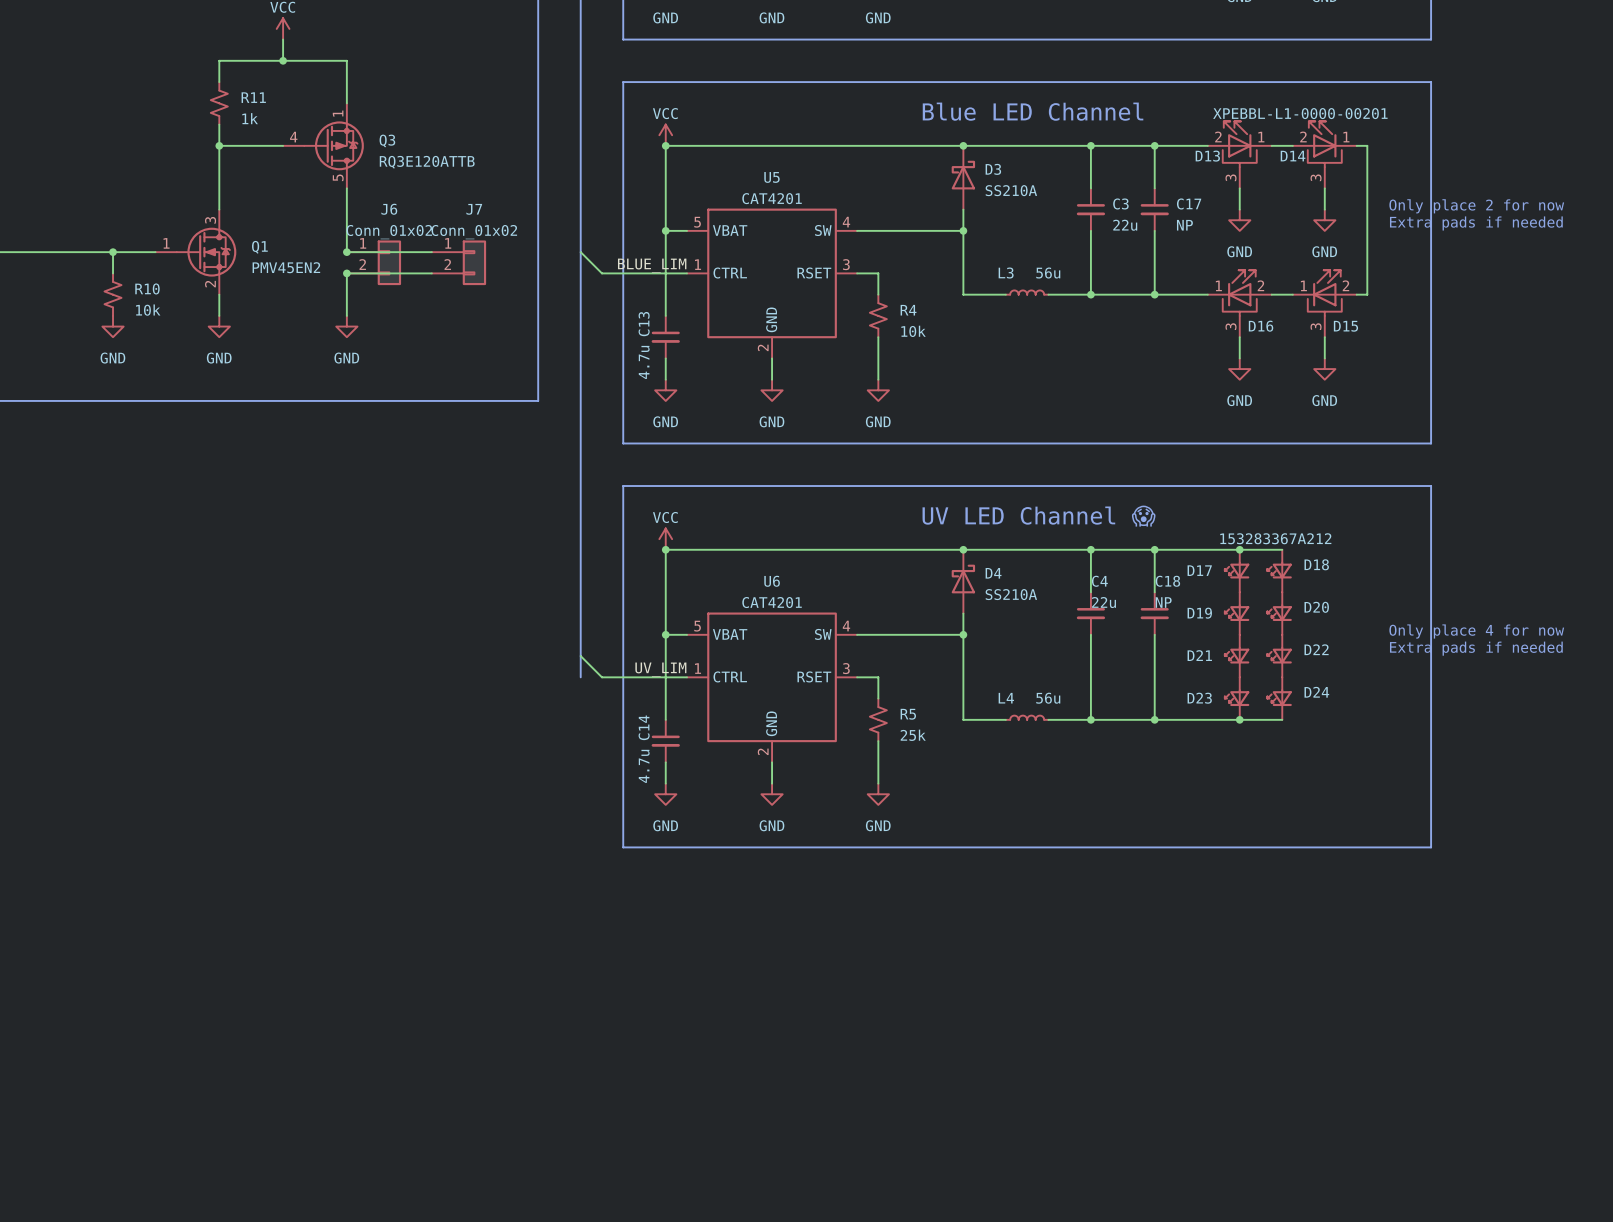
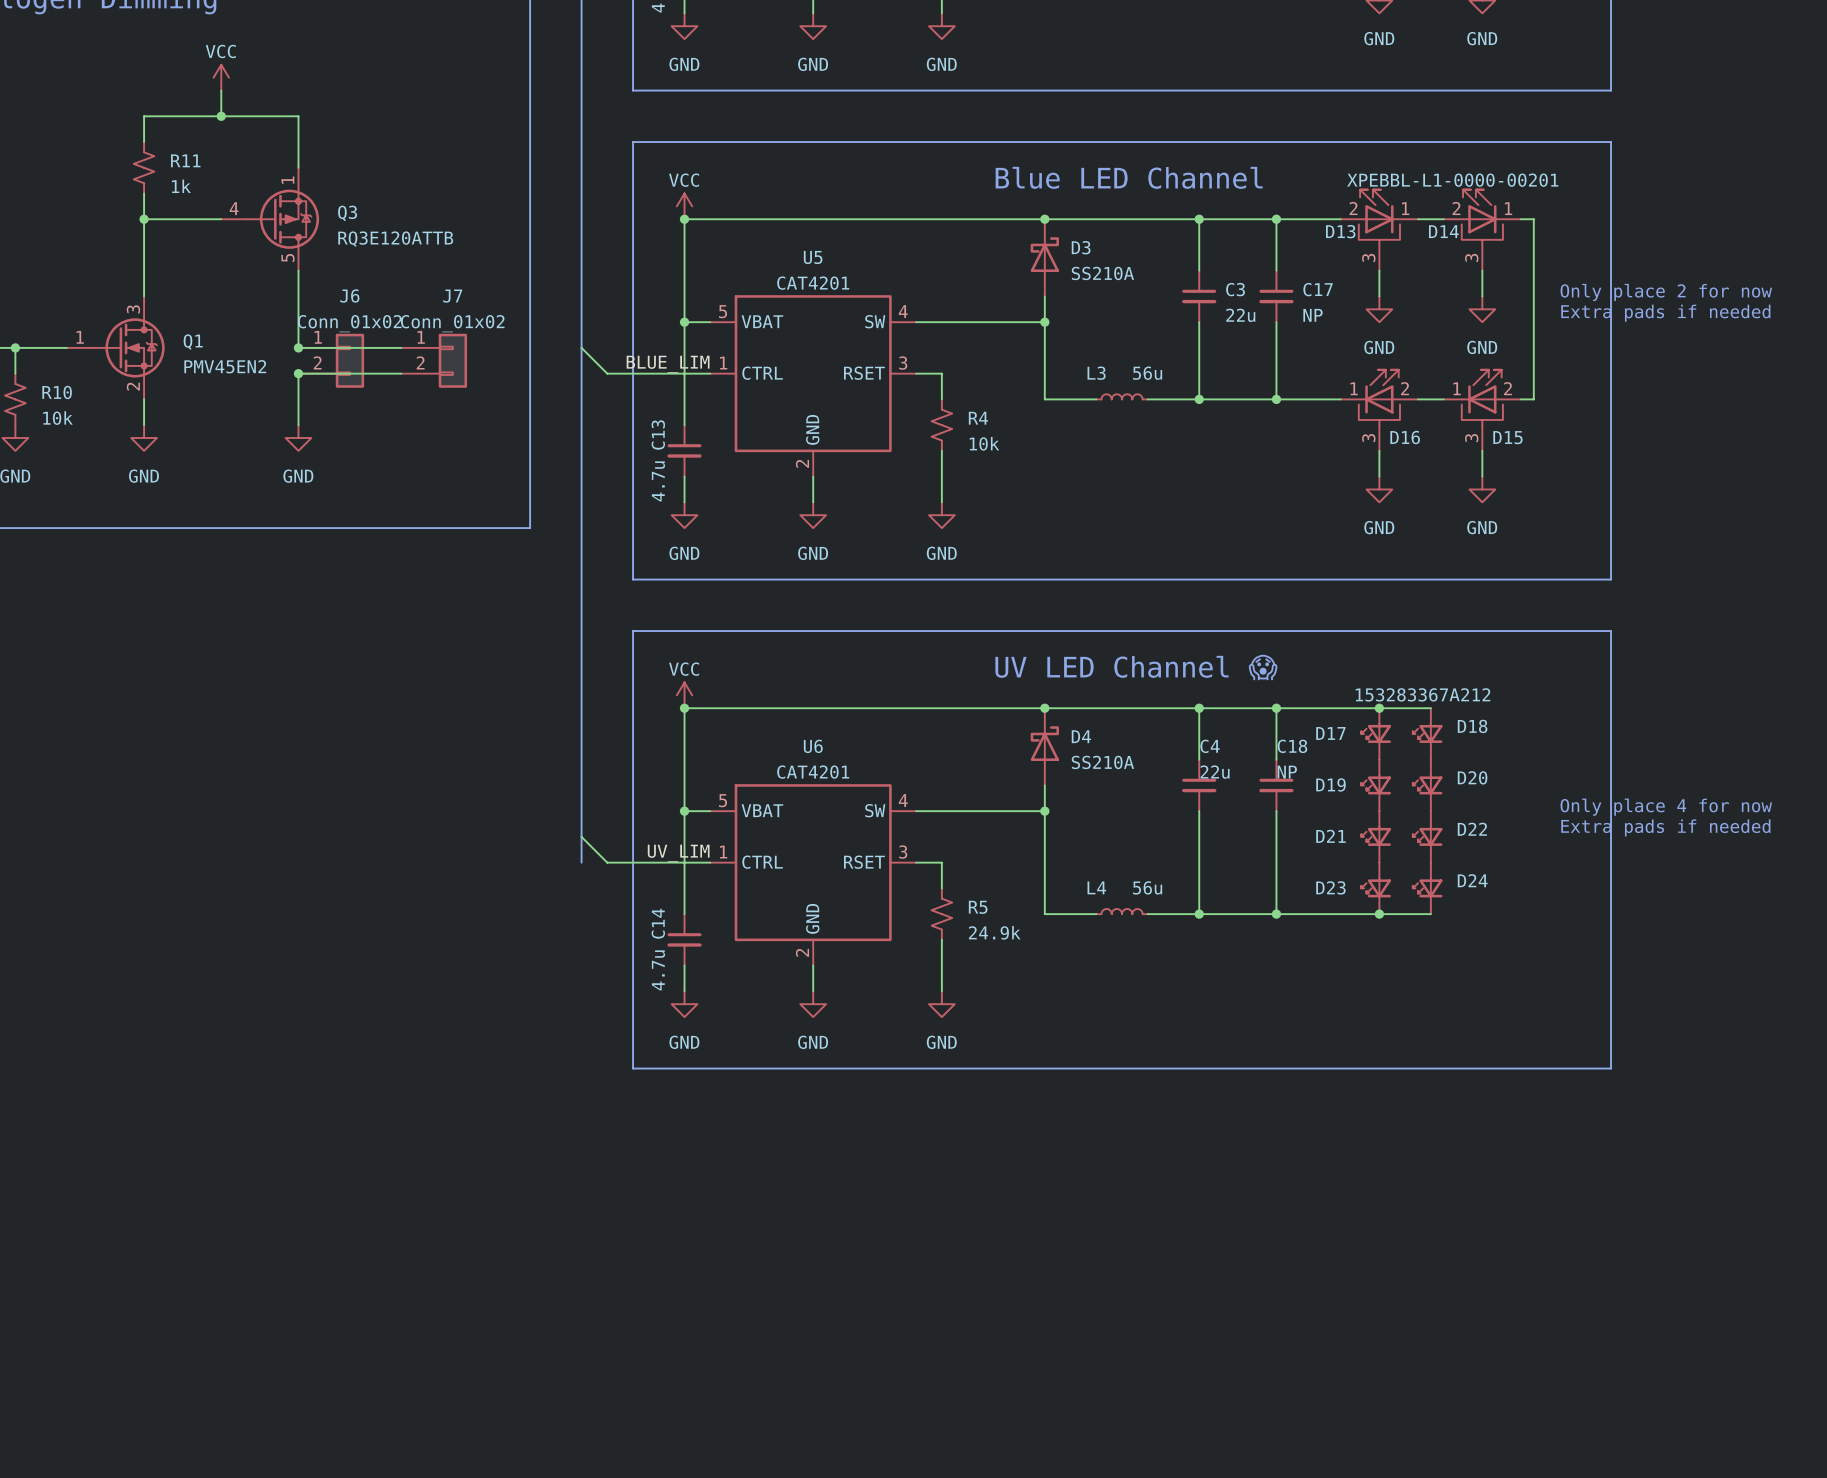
R5 value: 25k (913, 735) -> 24.9k (994, 932)

